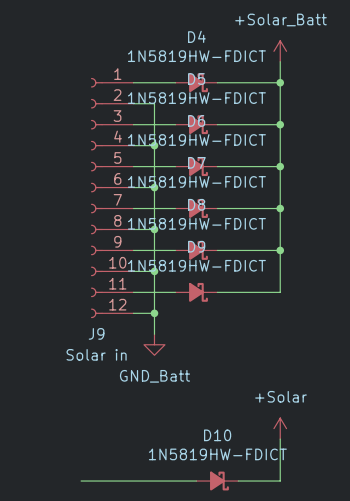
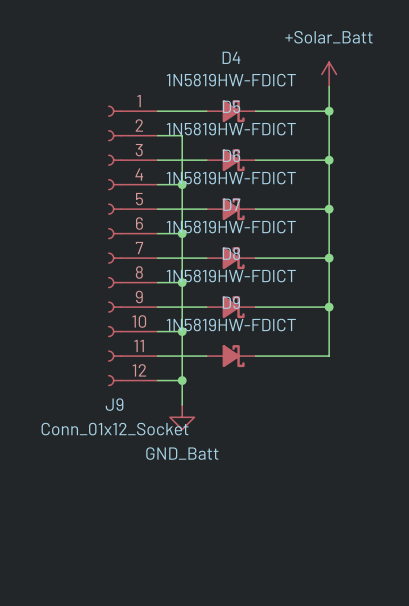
J9 value: Solar in (96, 354) -> Conn_01x12_Socket (115, 429)
power symbol: +Solar (280, 428) -> none
wire: (280, 439) (280, 481) (238, 481) -> none
wire: (81, 481) (196, 481) -> none
D10: 1N5819HW-FDICT (217, 481) -> none

